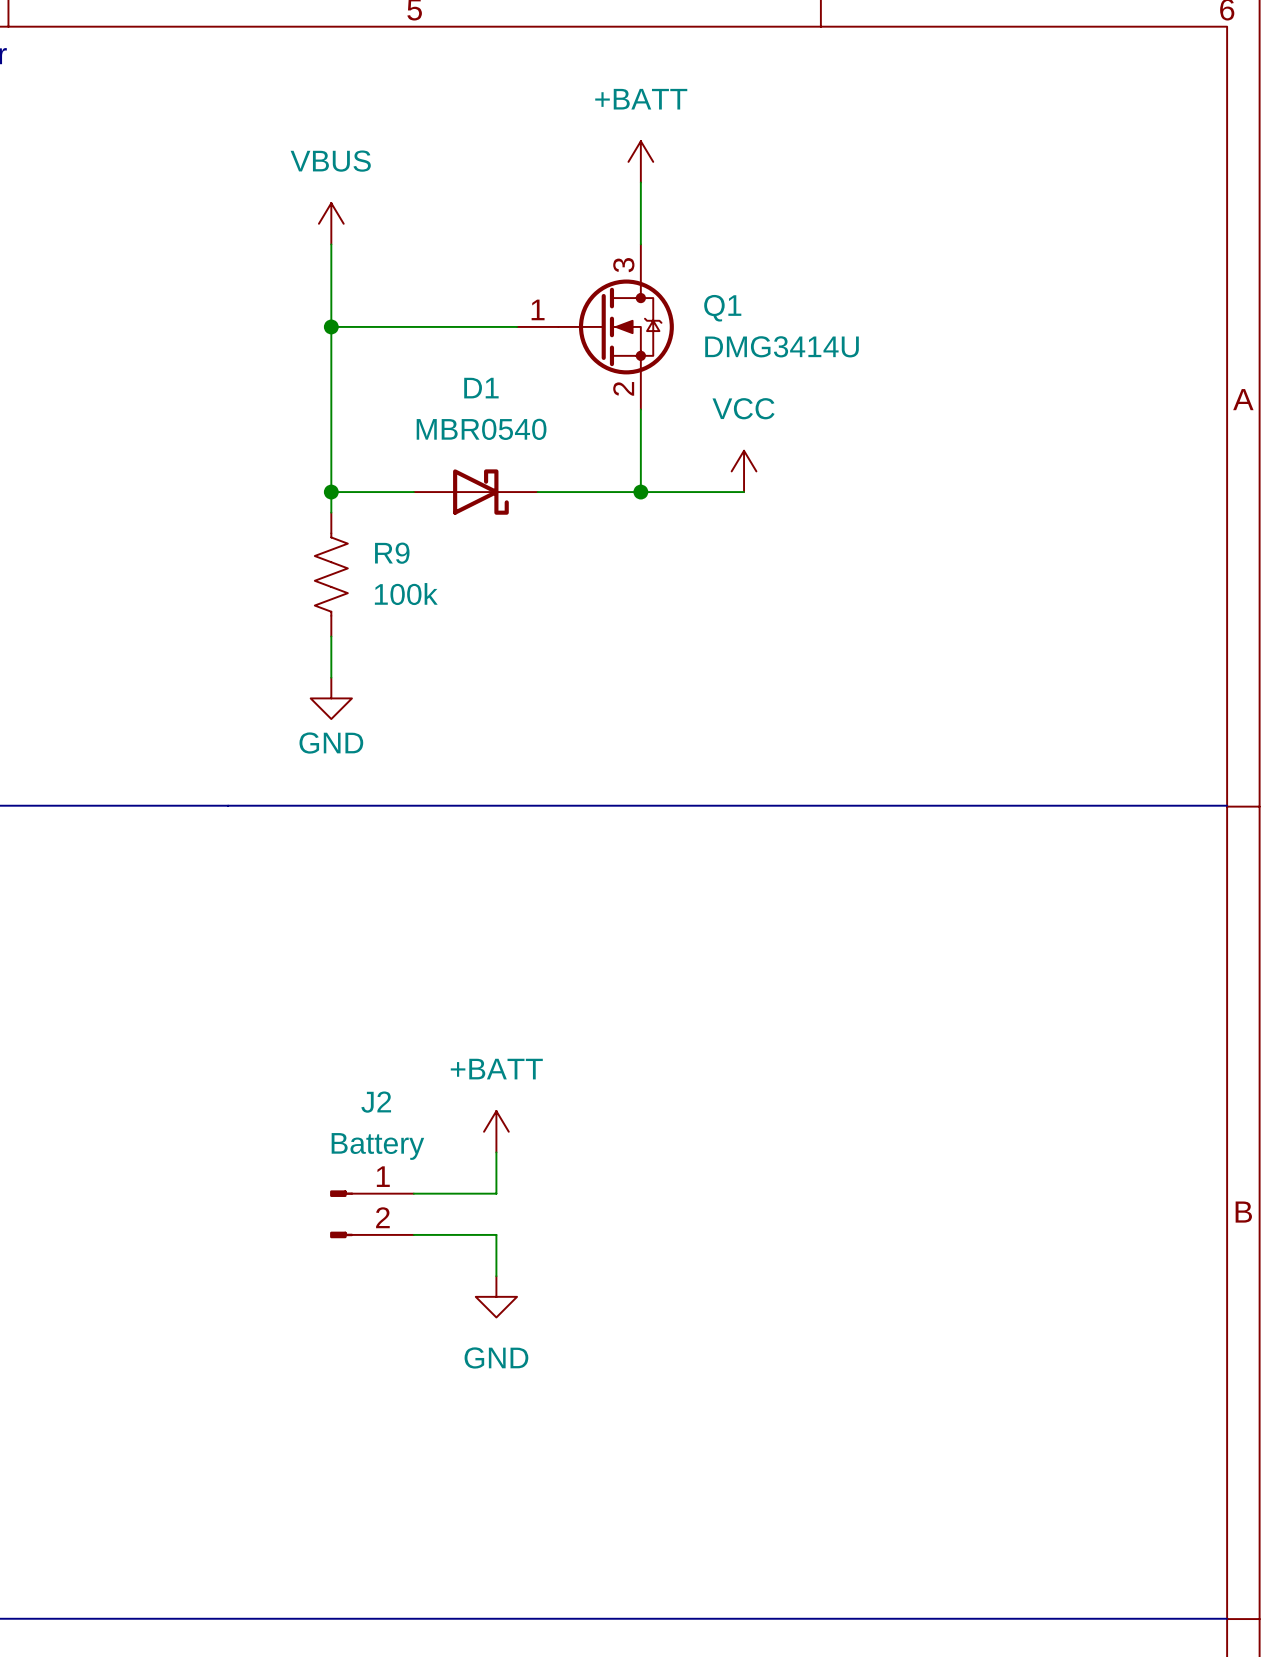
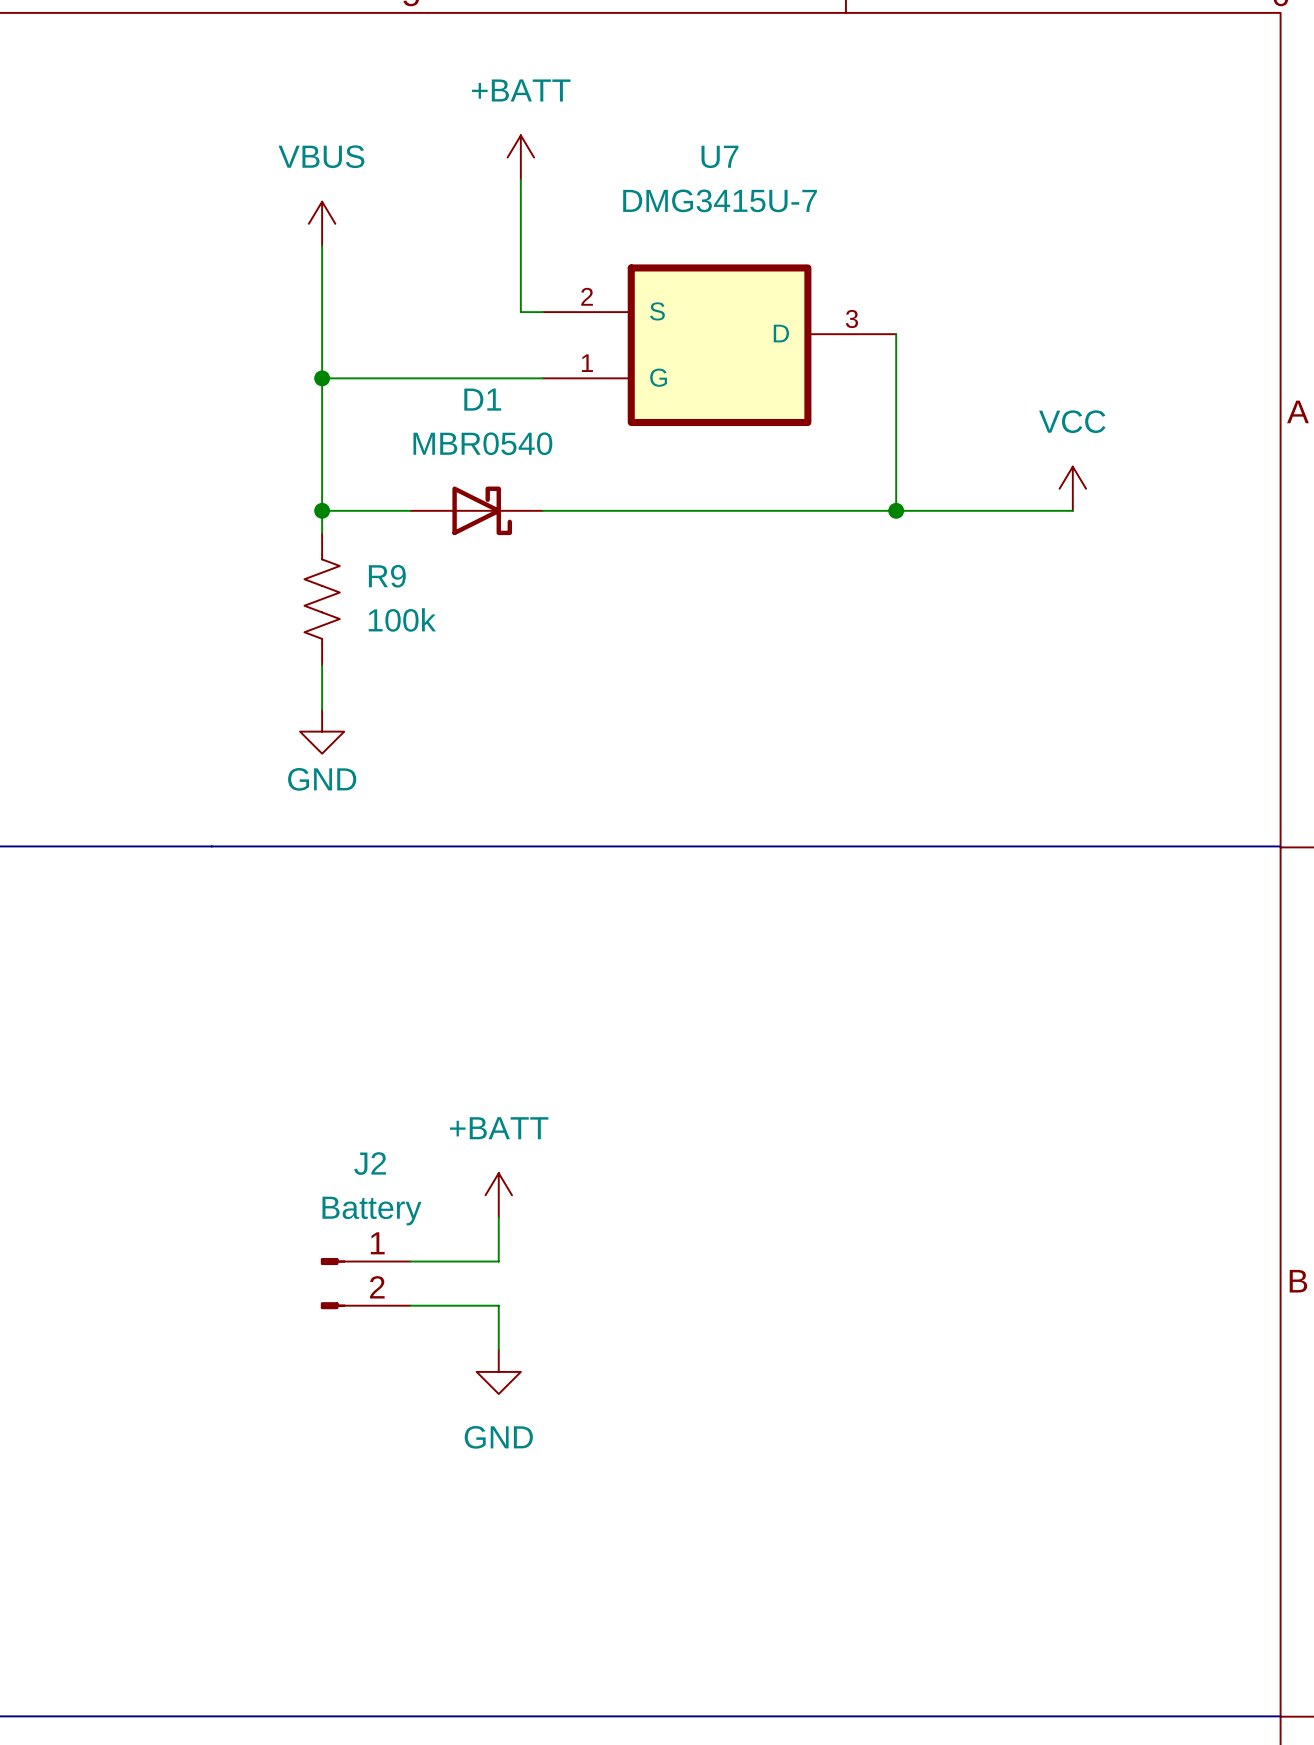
power symbol position: +BATT (640, 161) -> +BATT (520, 157)
wire: none -> (520, 179) (520, 312) (542, 312)
wire: (640, 182) (640, 244) -> none
wire: (331, 326) (517, 326) -> none
junction position: (331, 326) -> (322, 378)
Q1: DMG3414U (595, 326) -> none
wire: none -> (896, 334) (896, 510)
U7: none -> DMG3415U-7 (719, 345)
wire: none -> (322, 378) (542, 378)
wire: (640, 409) (640, 492) -> none
power symbol position: VCC (744, 471) -> VCC (1072, 488)
junction: (640, 492) -> none
wire: none -> (763, 510) (1072, 510)
junction: none -> (896, 510)

